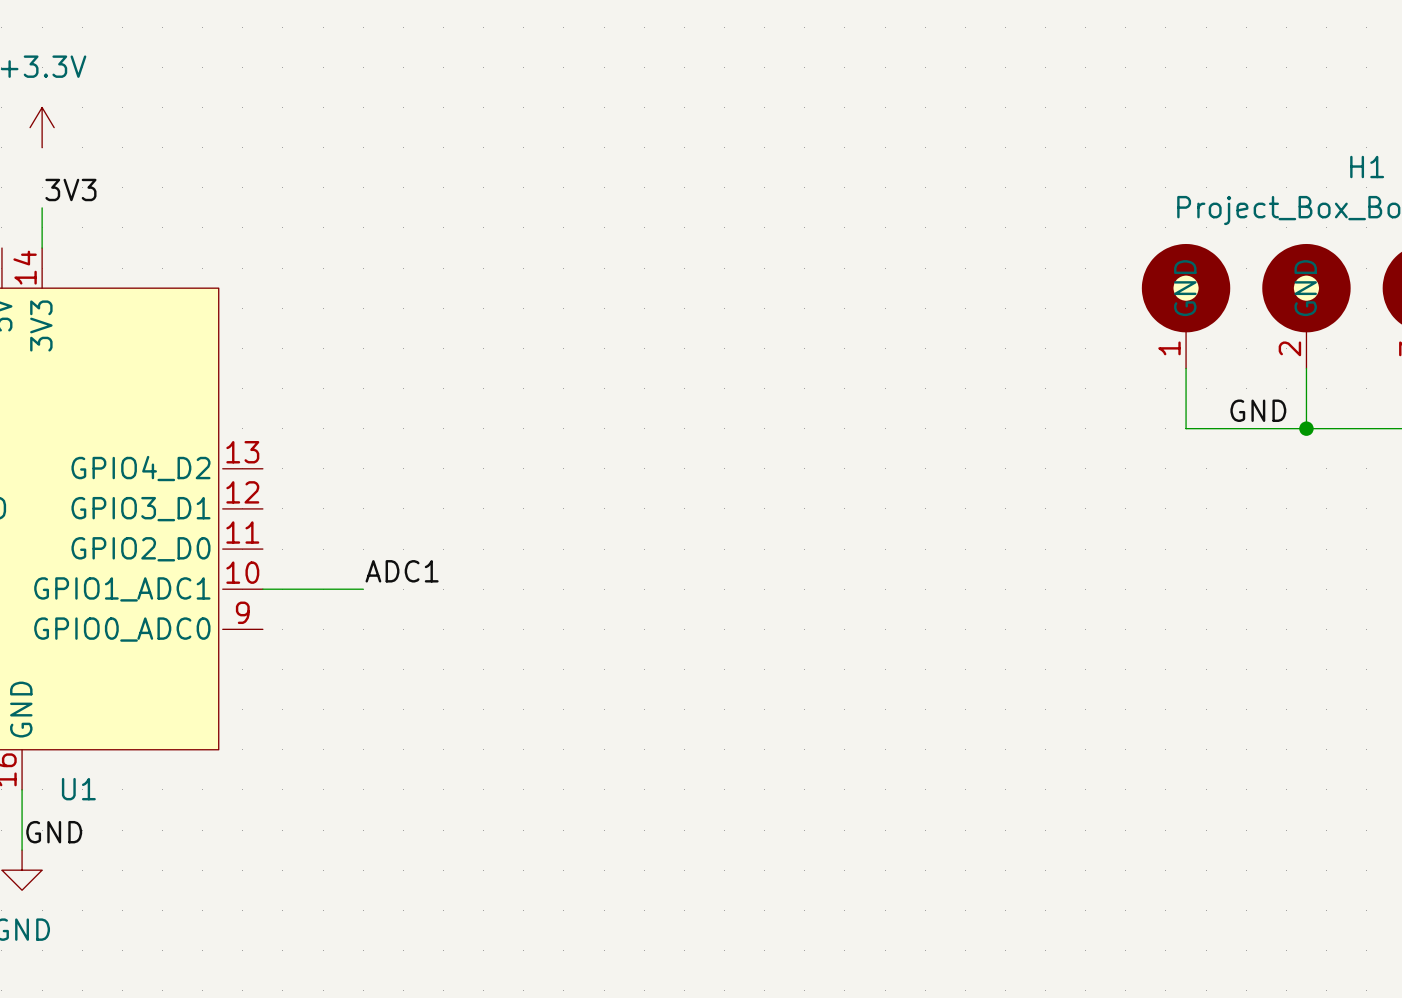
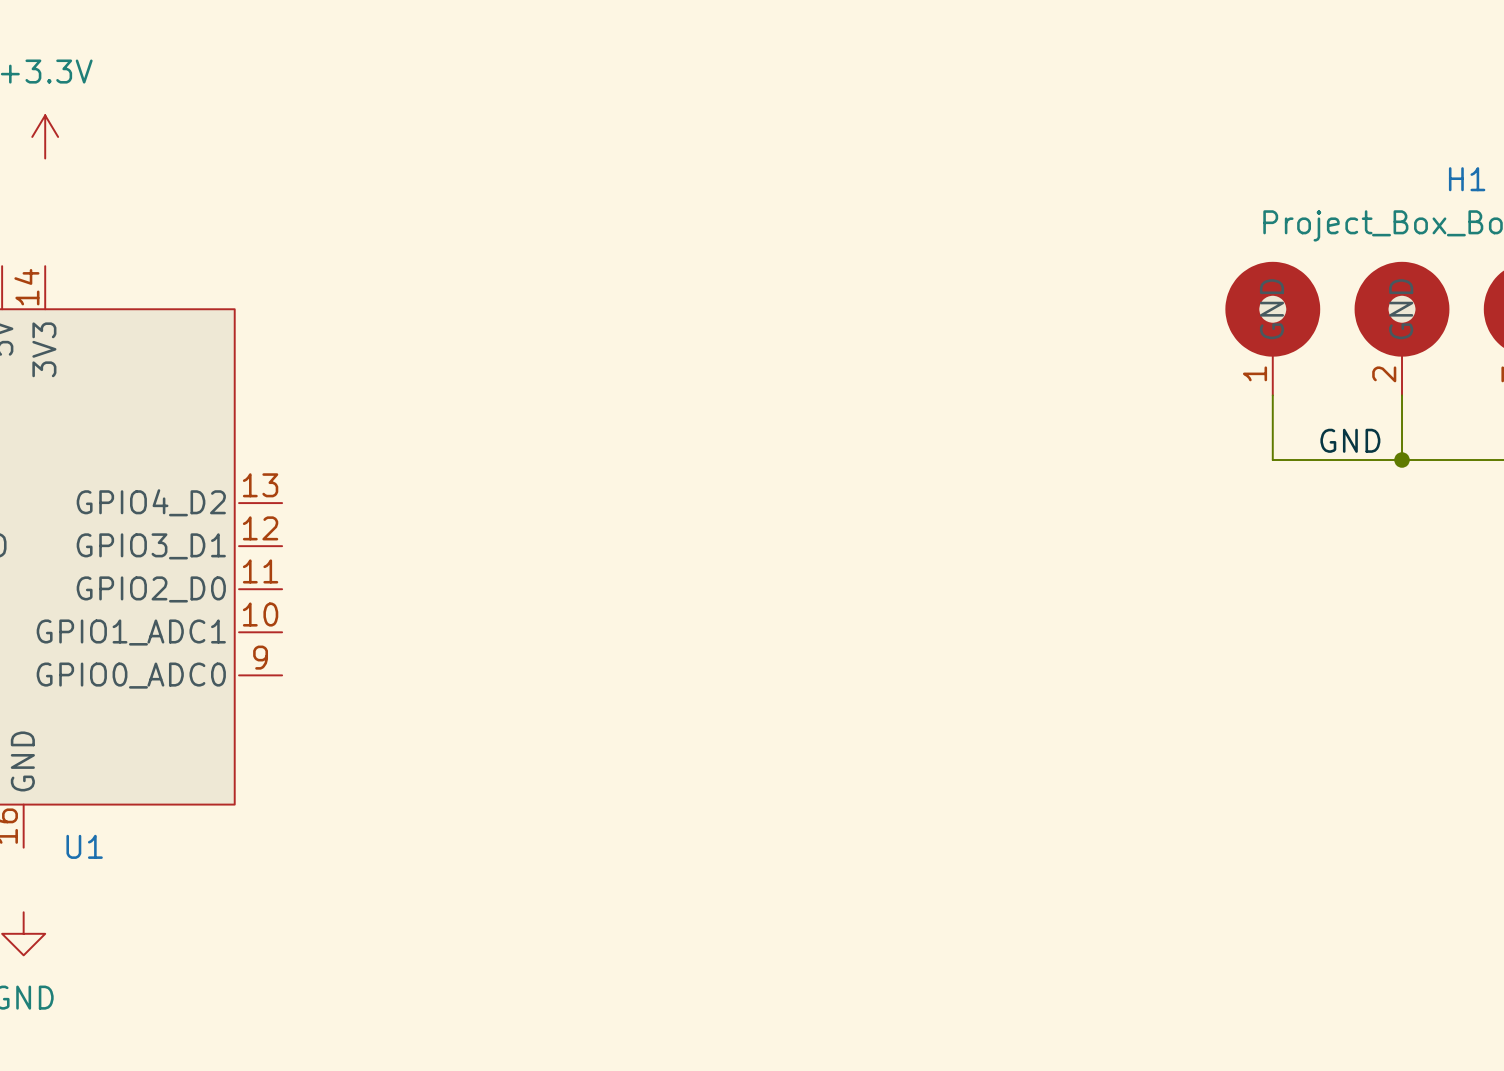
label: 3V3 (70, 189) -> none
wire: (42, 207) (42, 248) -> none
label: ADC1 (402, 571) -> none
wire: (262, 589) (363, 589) -> none
wire: (22, 789) (22, 850) -> none
label: GND (54, 832) -> none

